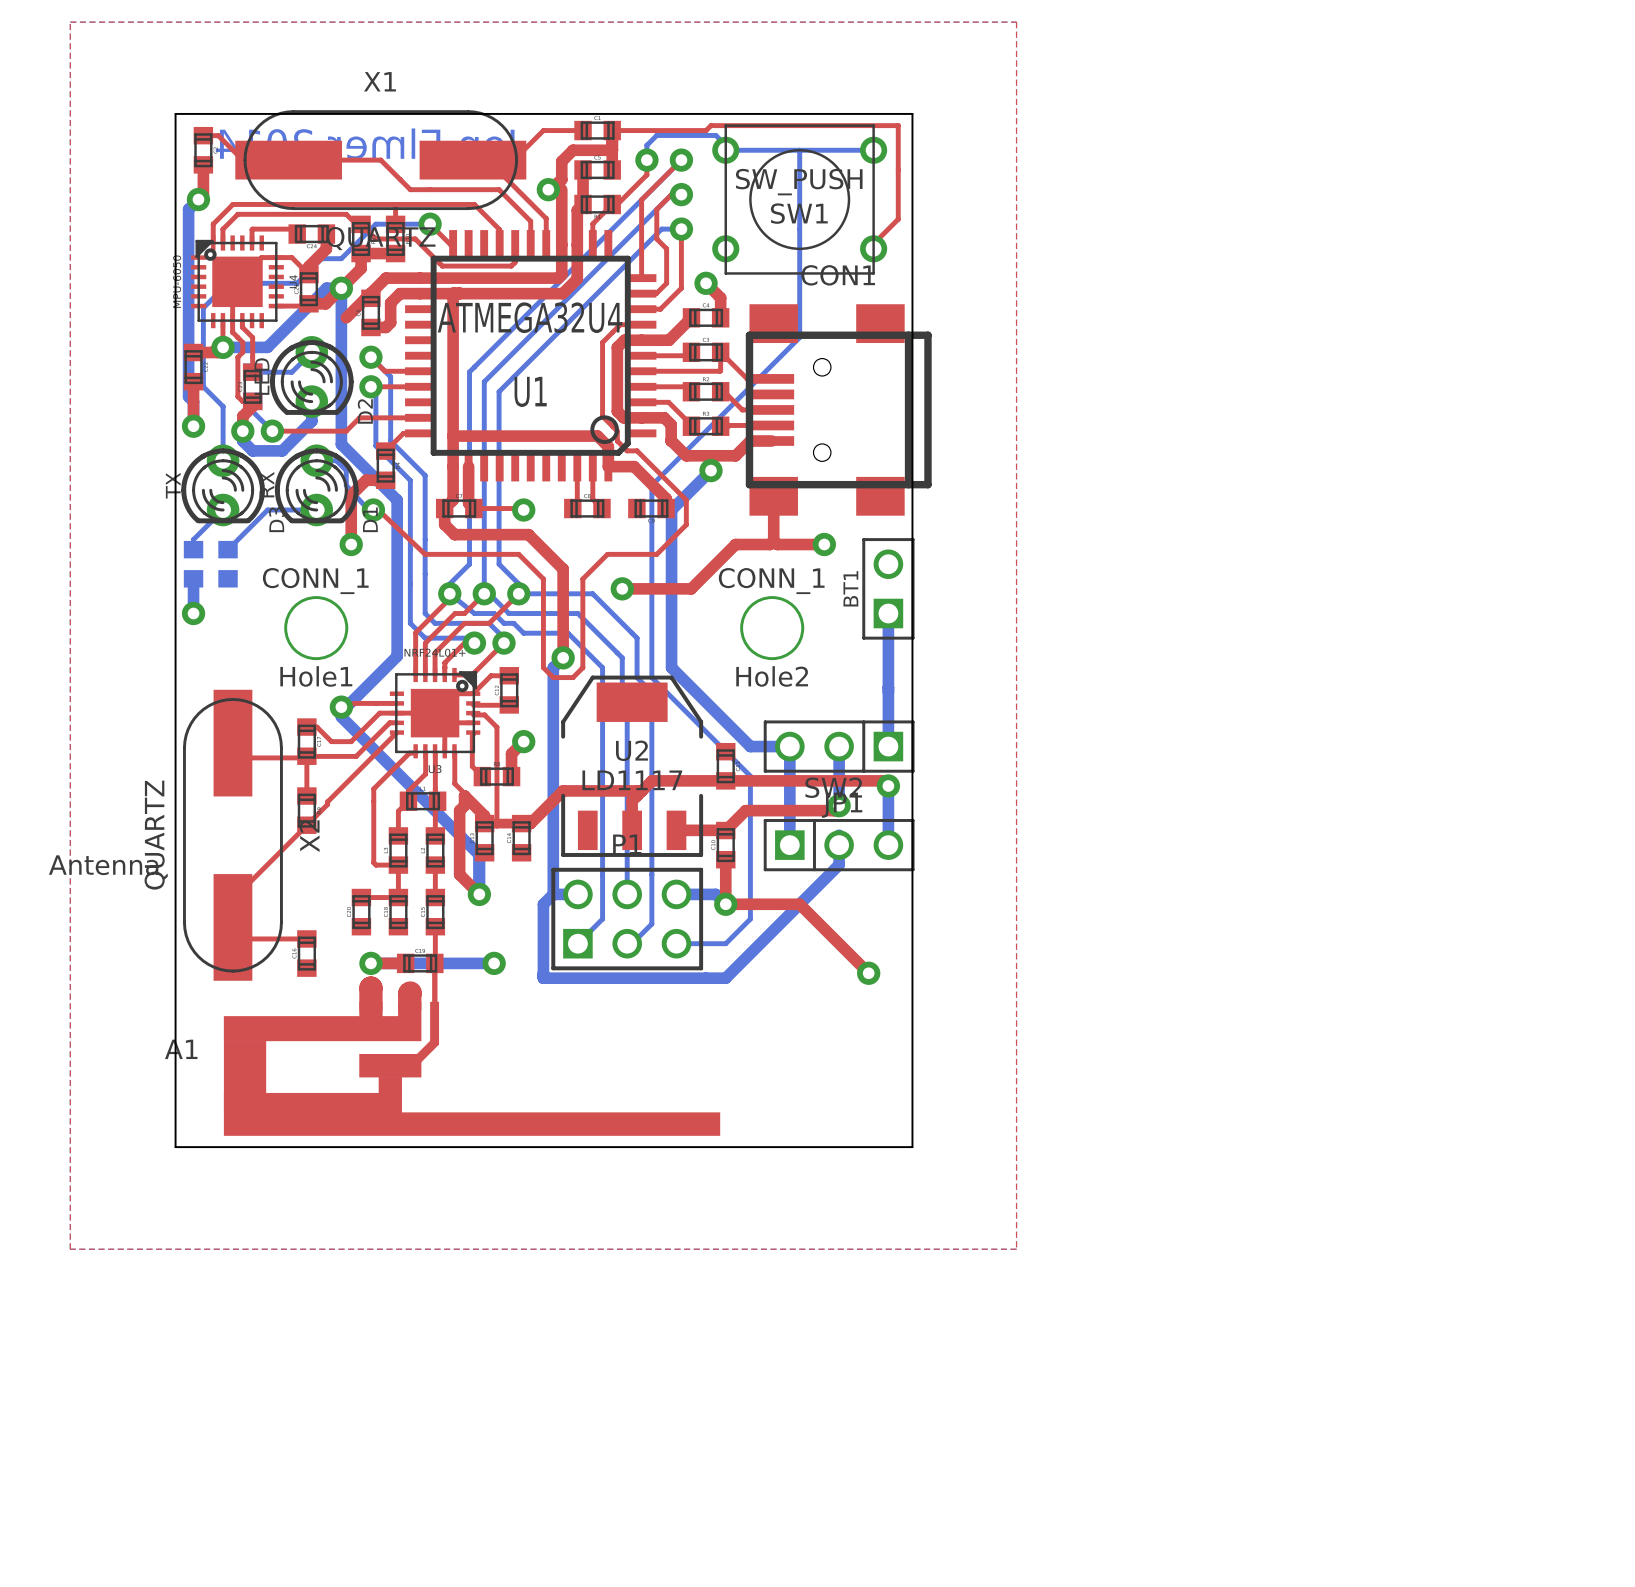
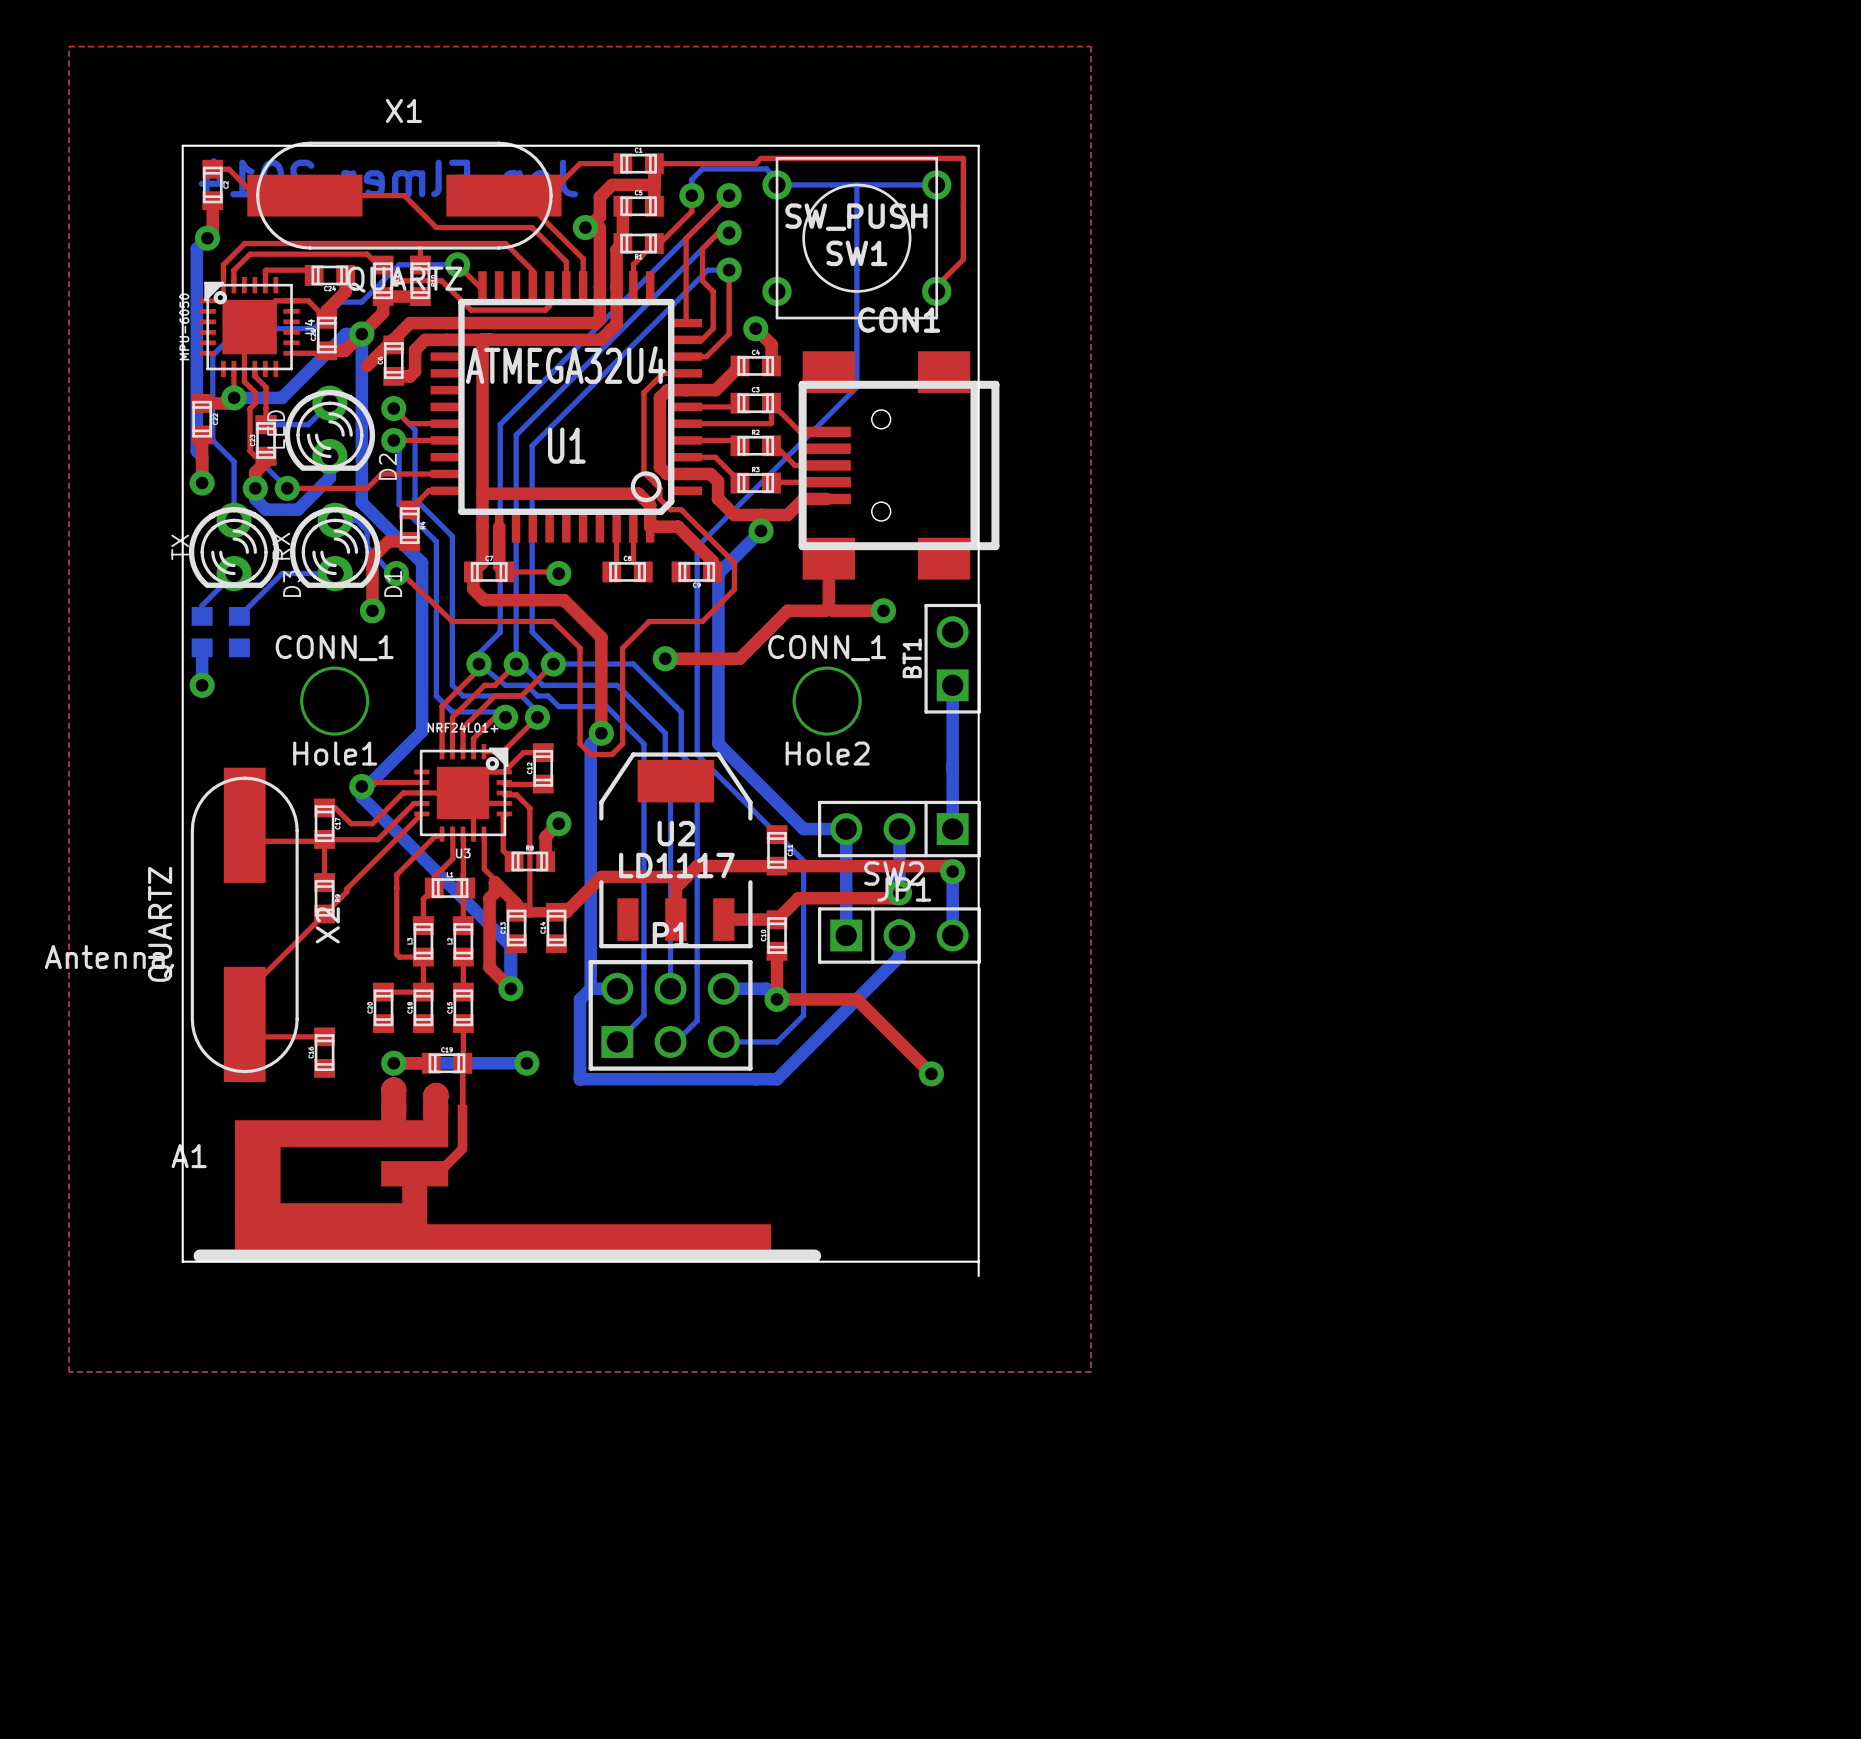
A1 footprint: [223, 1001, 721, 1136] -> [193, 1104, 822, 1263]
board edge: none -> (978, 1261) (978, 1276)

